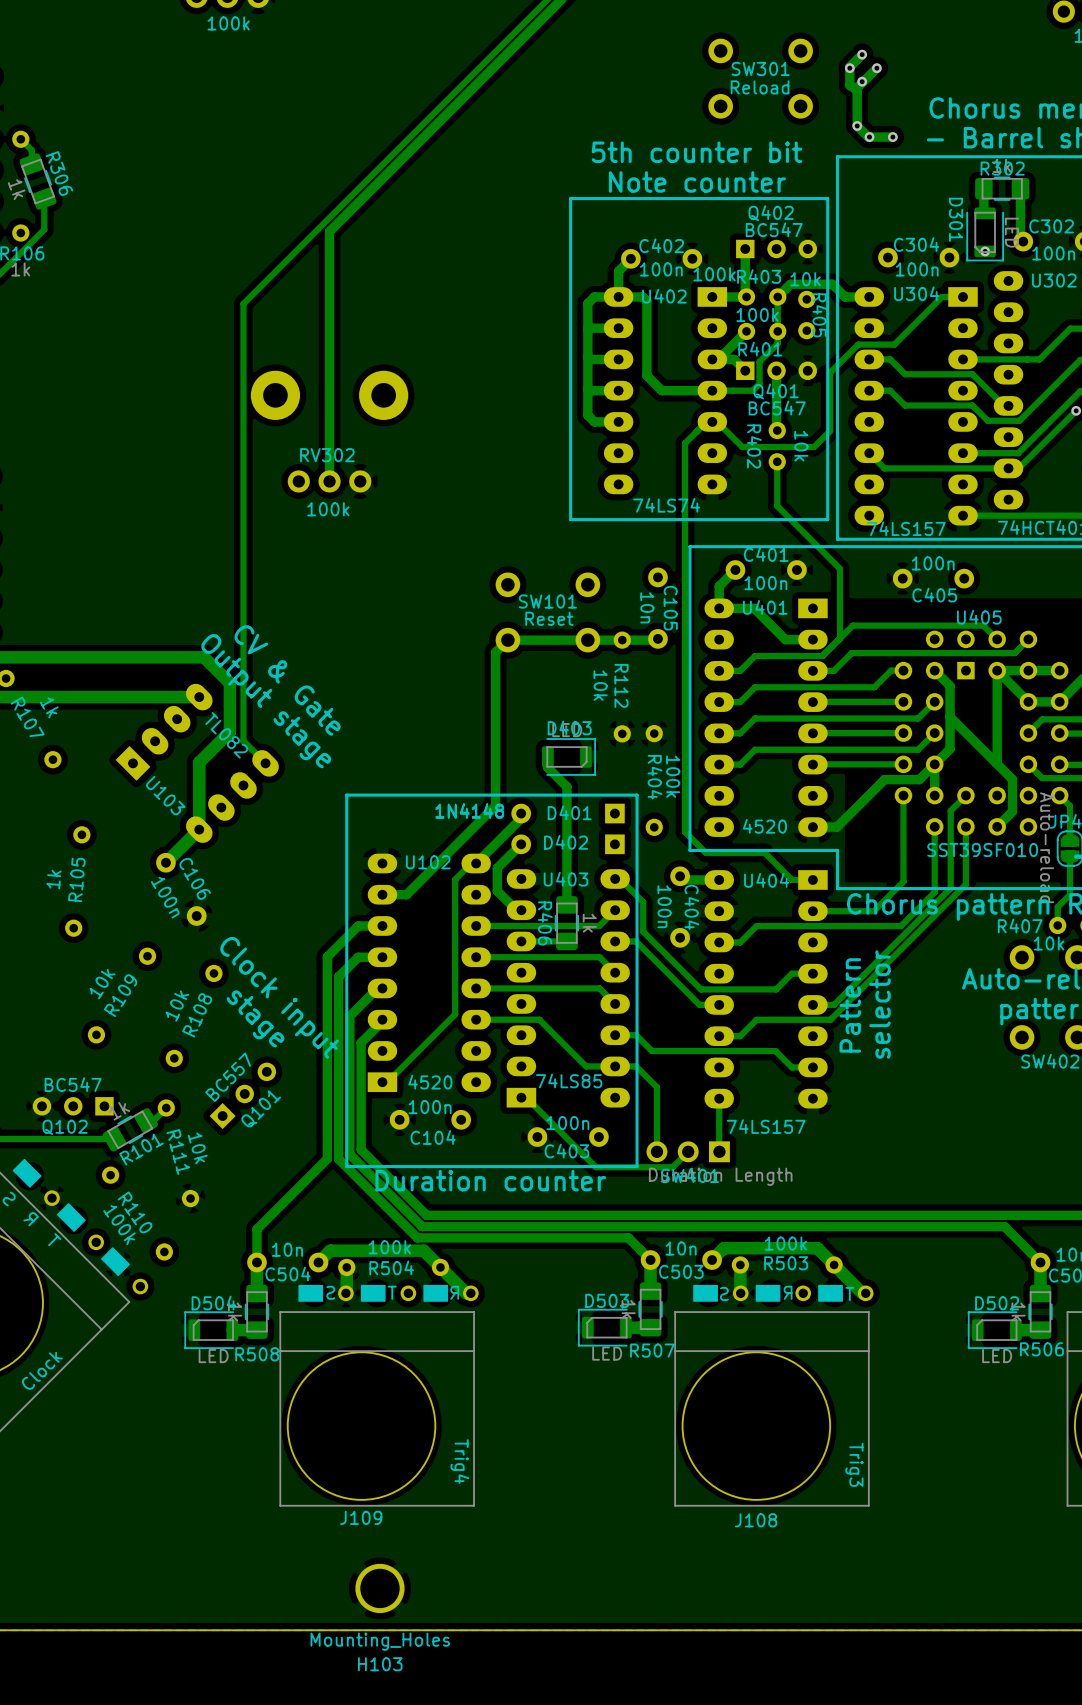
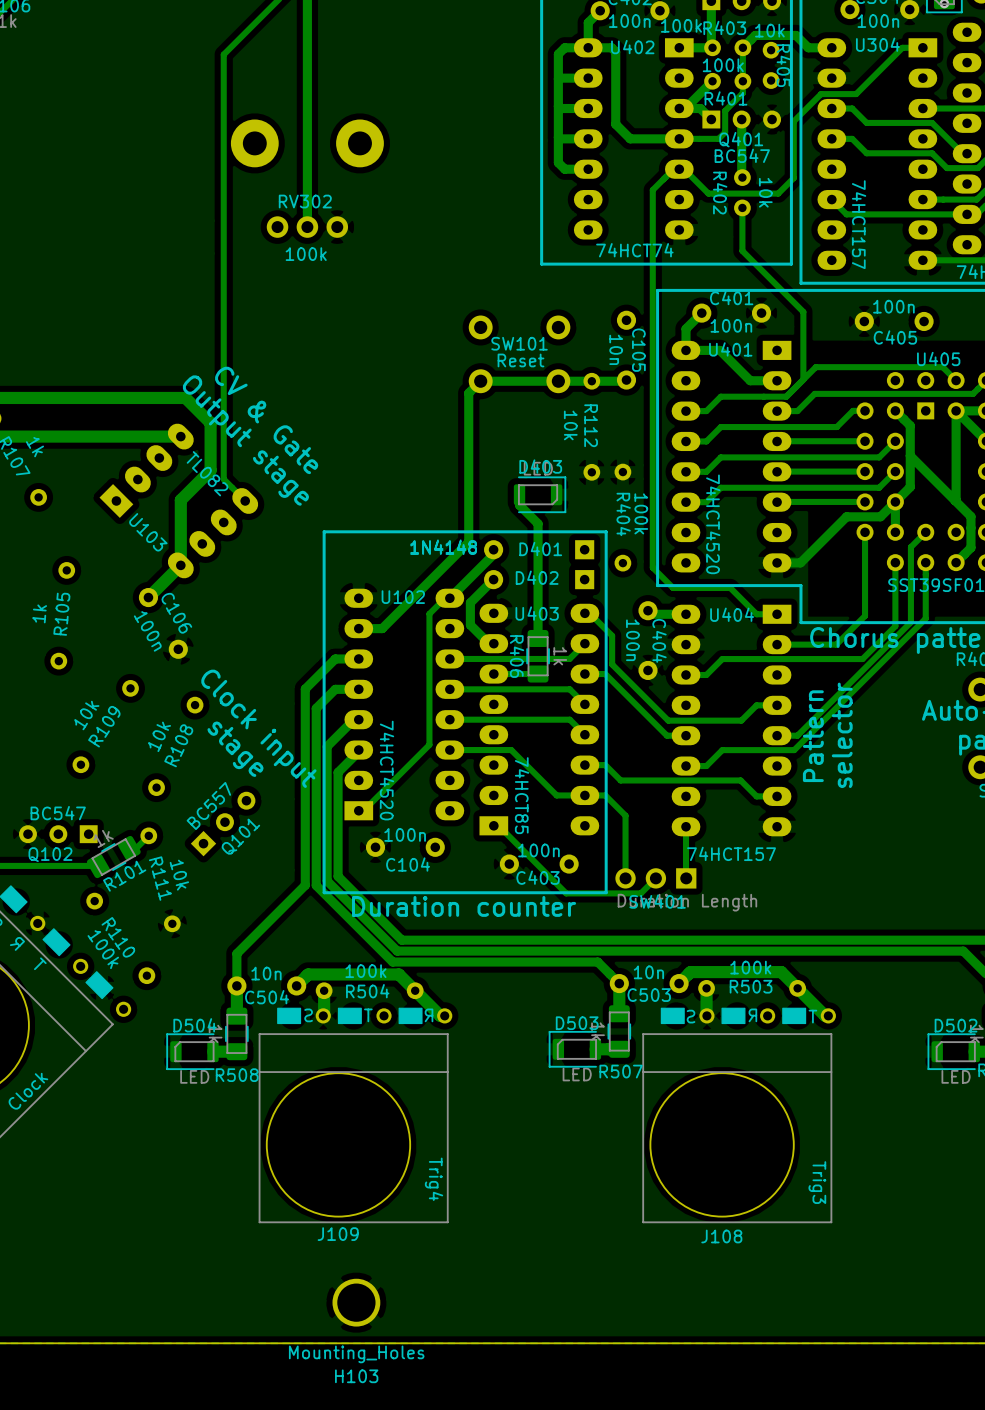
U402 value: 74LS74 (666, 505) -> 74HCT74 (634, 250)
U304 value: 74LS157 (906, 528) -> 74HCT157 (859, 224)
U401 value: 4520 (764, 826) -> 74HCT4520 (713, 524)
U403 value: 74LS85 (569, 1080) -> 74HCT85 (522, 795)
U102 value: 4520 (430, 1082) -> 74HCT4520 (387, 770)
U404 value: 74LS157 (766, 1126) -> 74HCT157 (731, 853)

